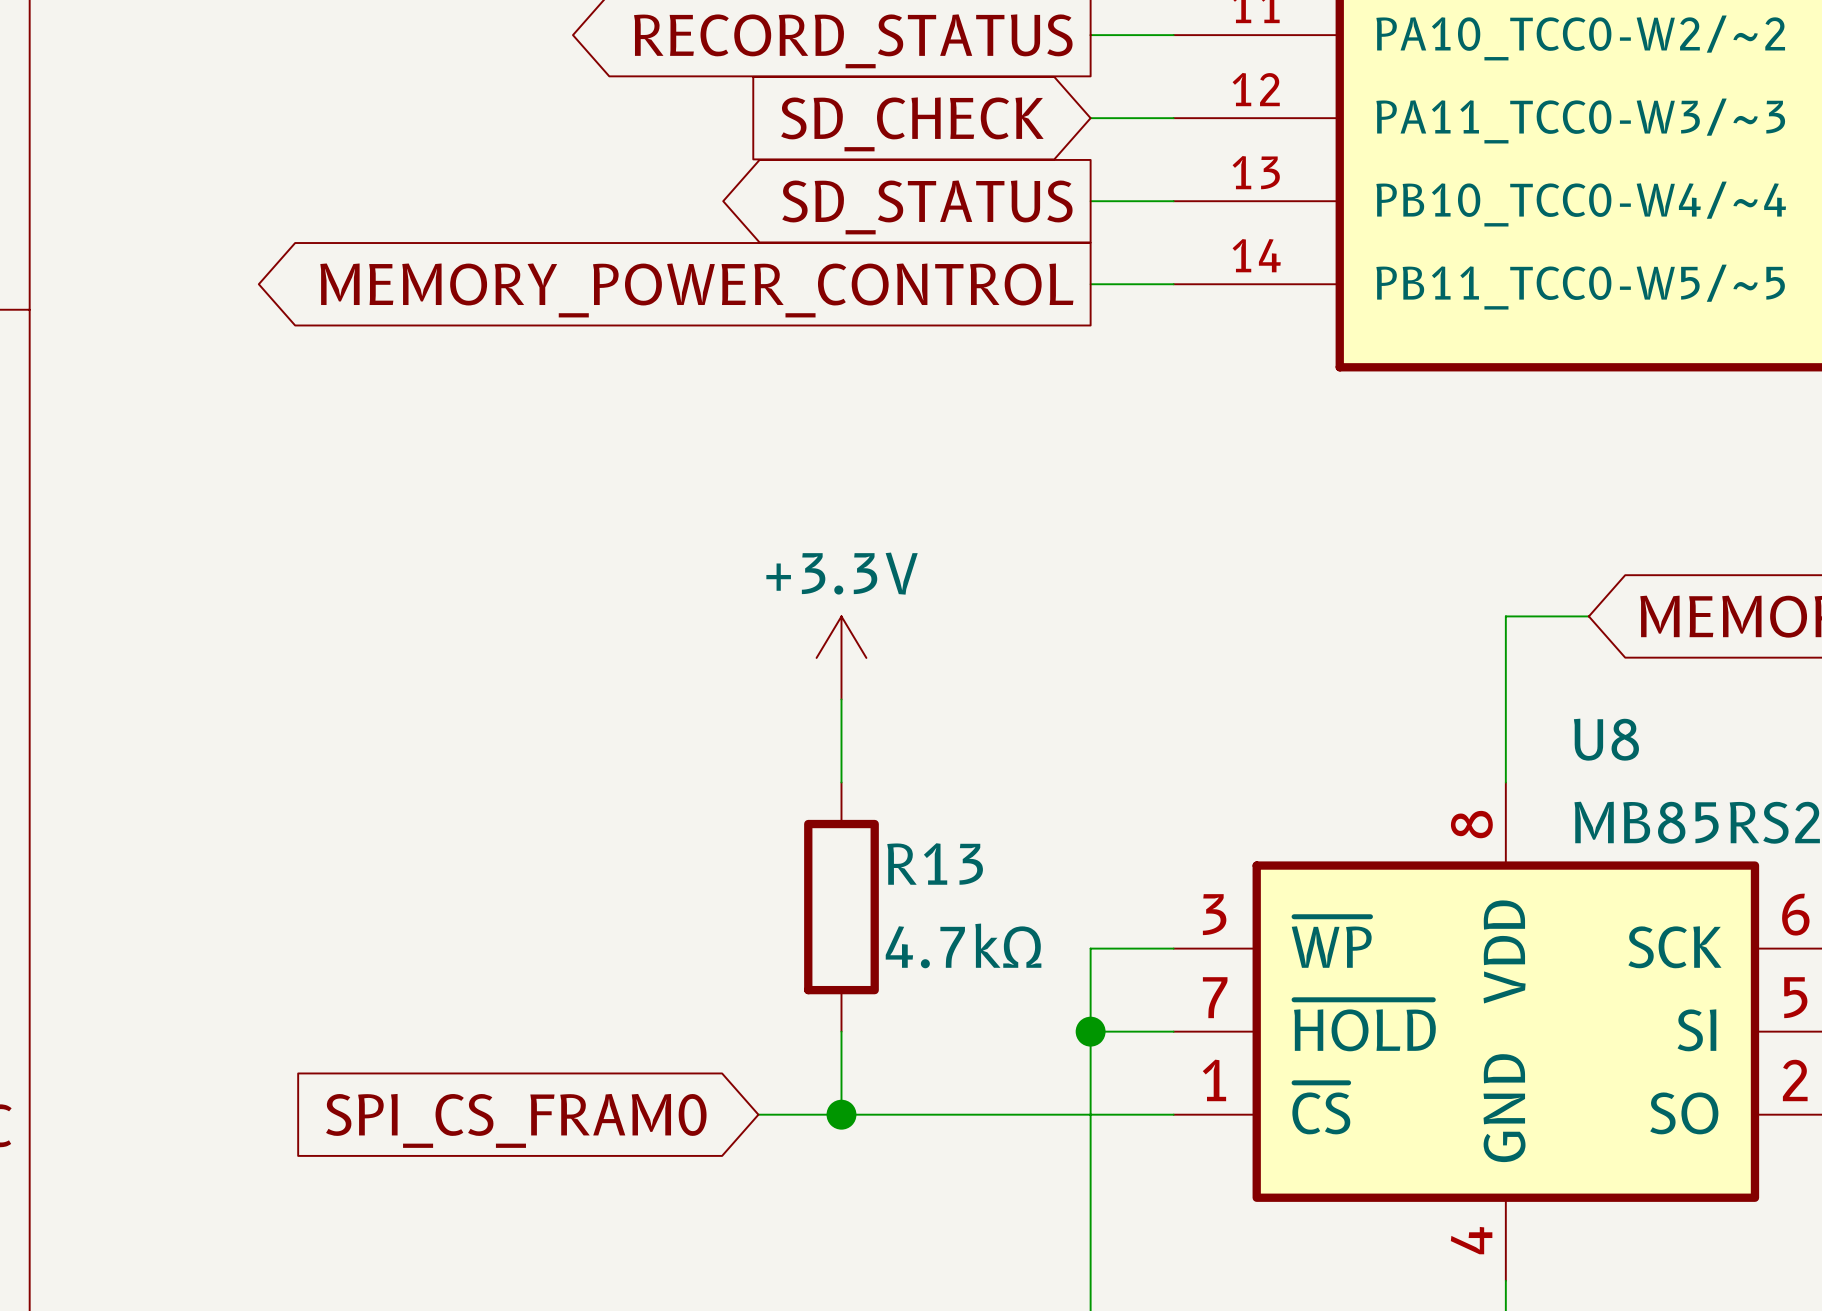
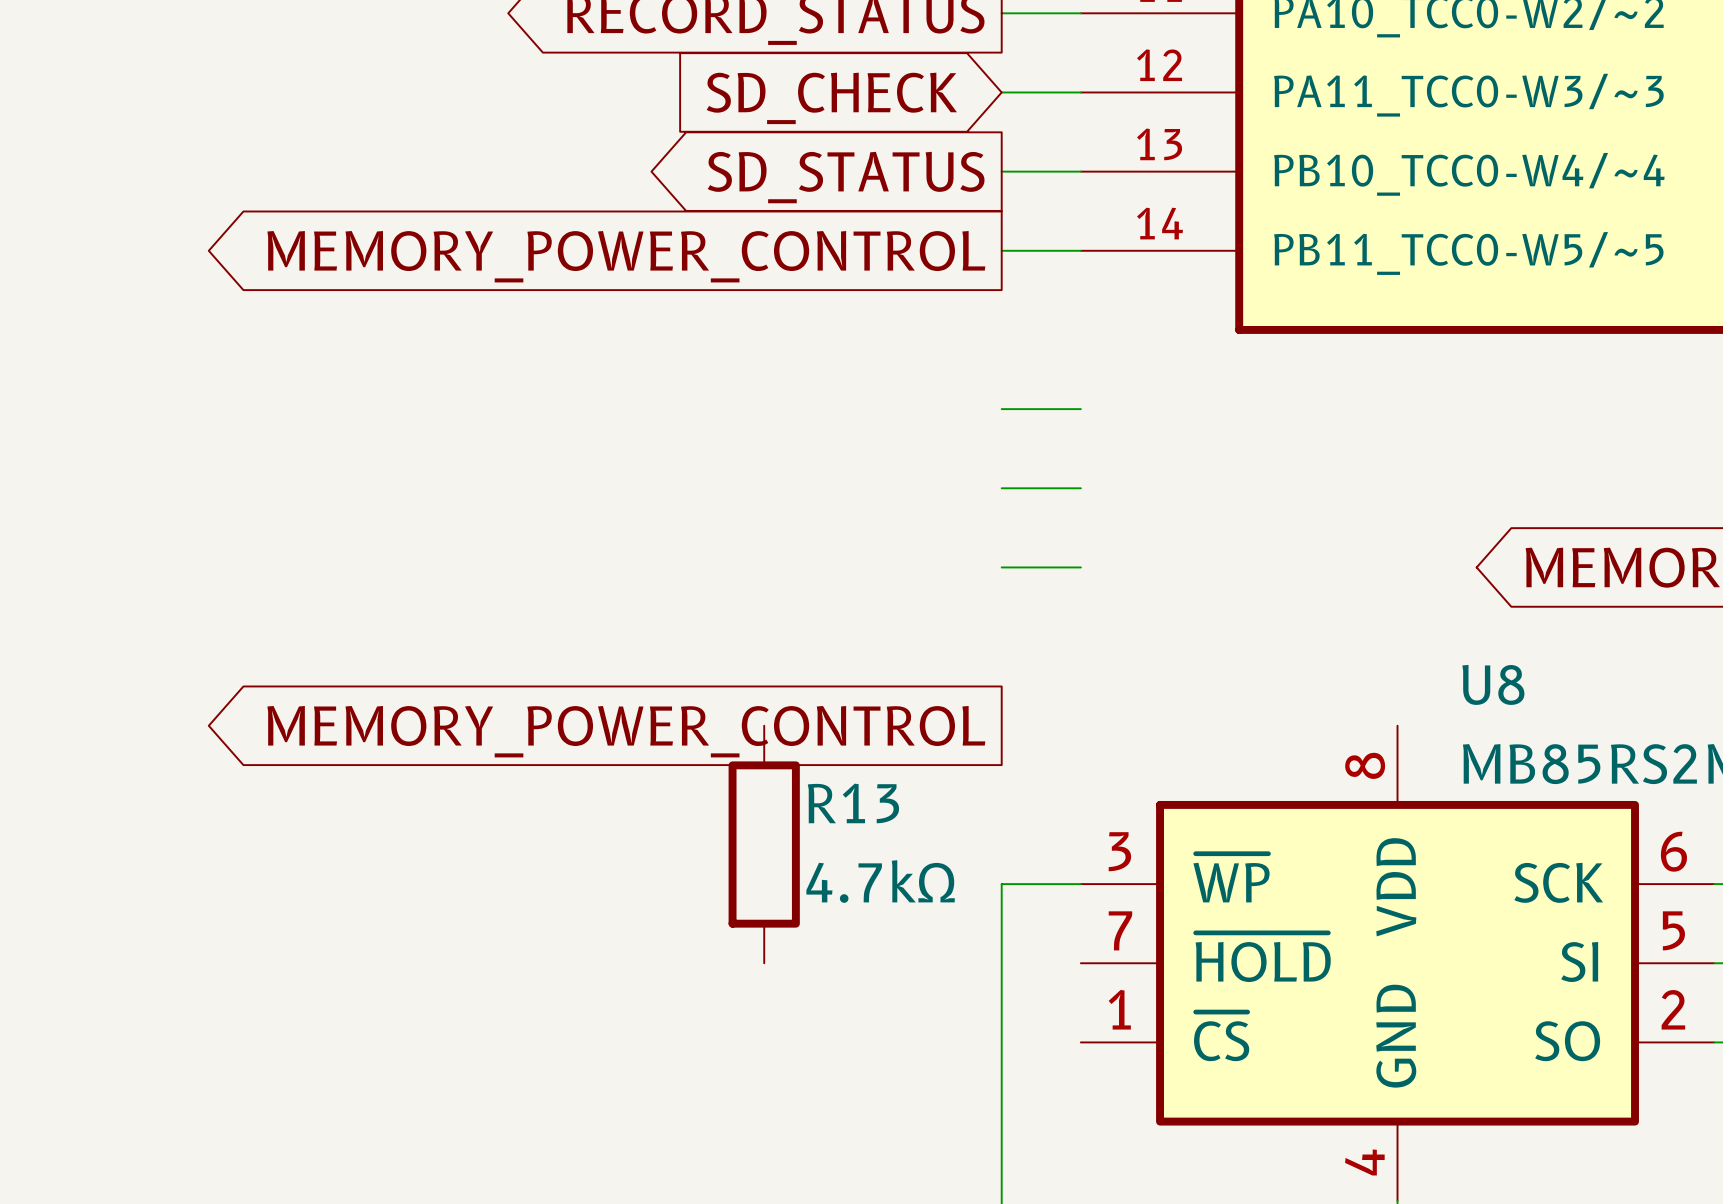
wire: none -> (1001, 409) (1080, 409)
wire: none -> (1001, 488) (1080, 488)
wire: (1588, 616) (1505, 616) (1505, 782) -> none
power symbol: +3.3V (841, 657) -> none
wire: (841, 699) (841, 782) -> none
global label: none -> MEMORY_POWER_CONTROL (626, 731)
wire: (841, 1031) (841, 1114) -> none
wire: (1090, 1031) (1173, 1031) -> (1001, 567) (1080, 567)
junction: (1090, 1031) -> none
wire: (758, 1114) (1173, 1114) -> none
junction: (841, 1114) -> none
global label: SPI_CS_FRAM0 (516, 1120) -> none

